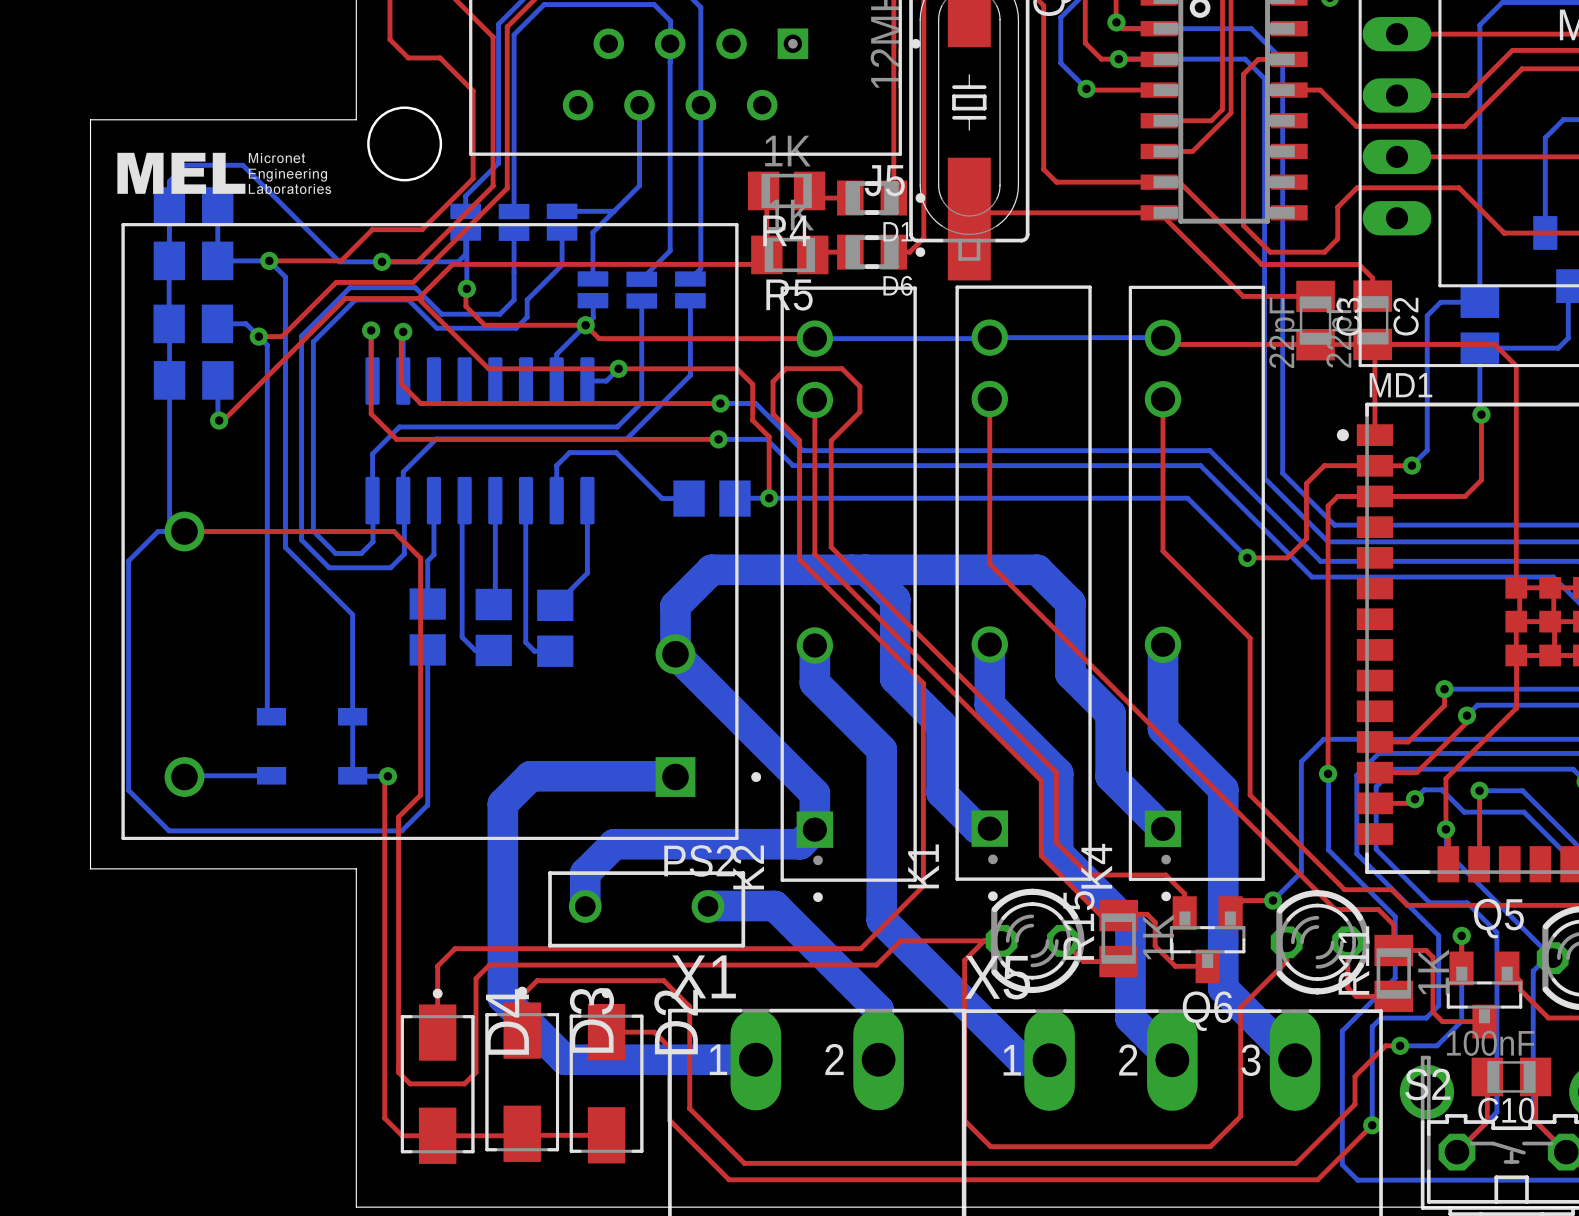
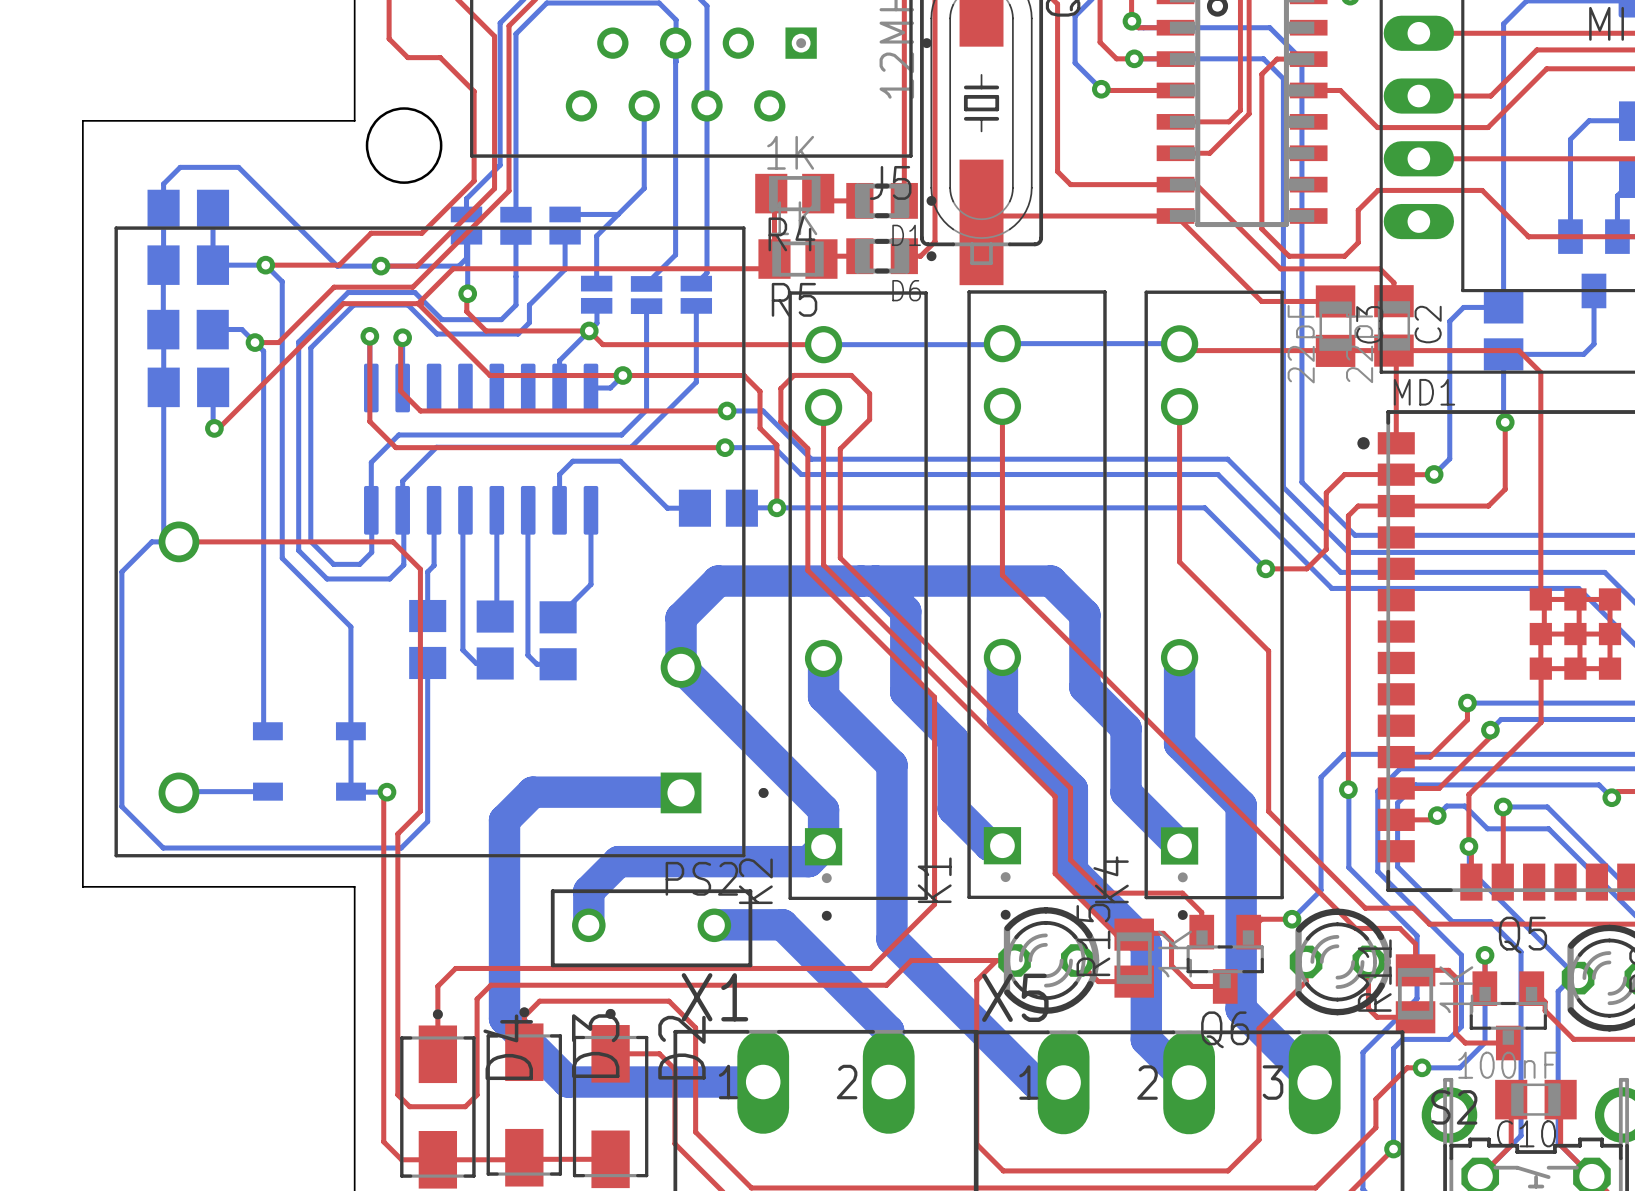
drawing: [117, 152, 332, 195] -> none

